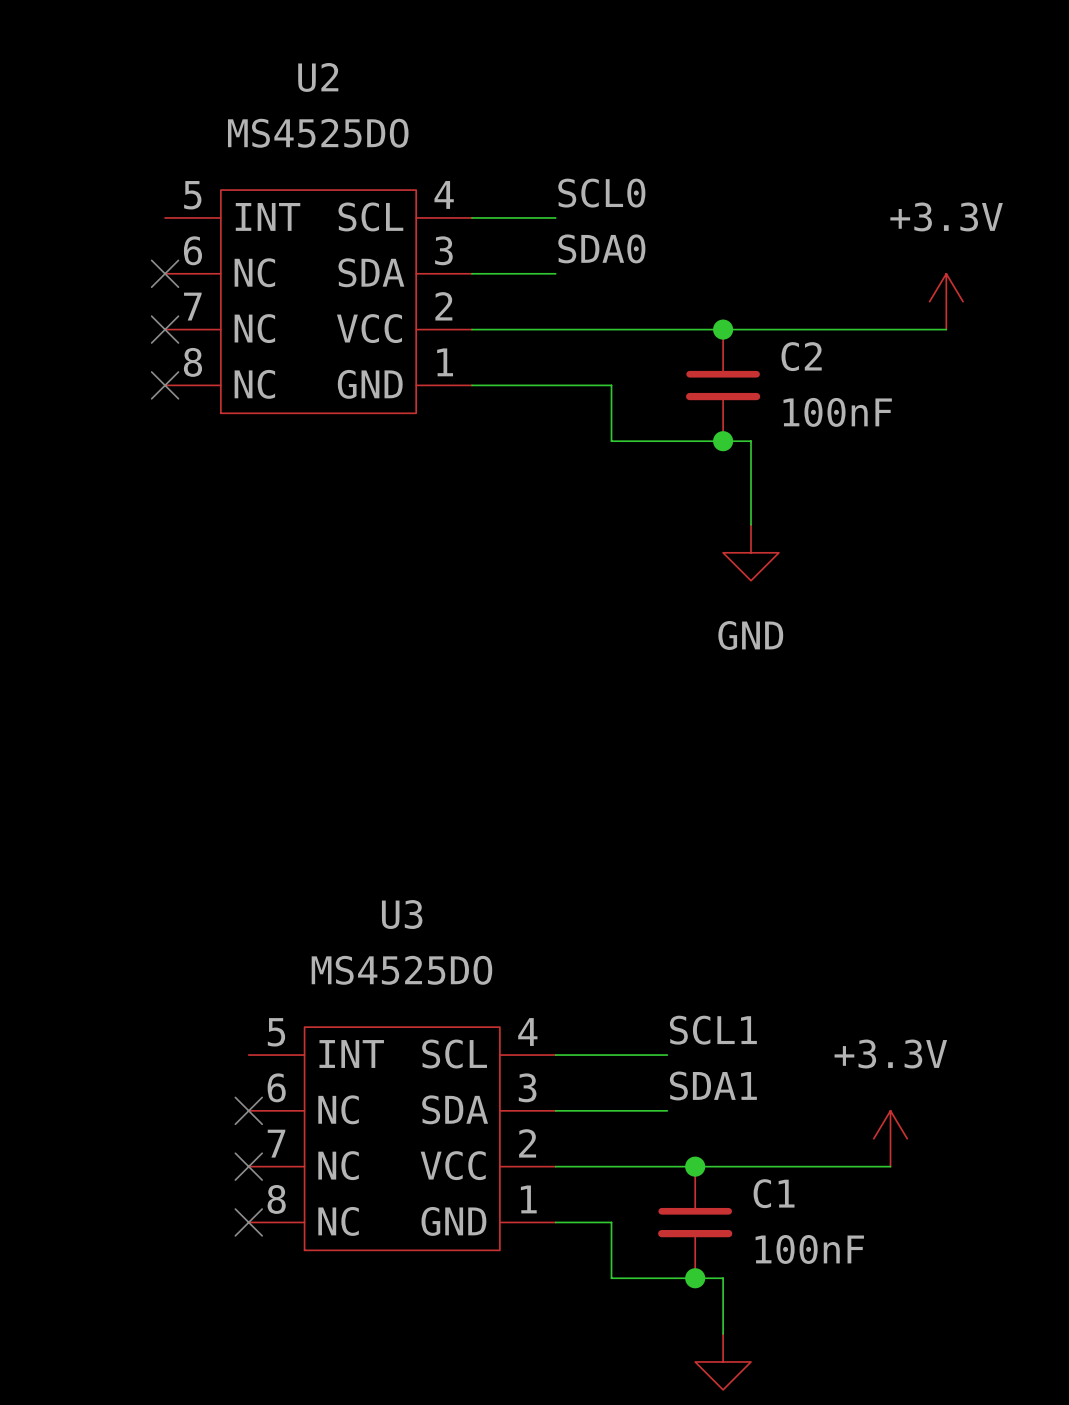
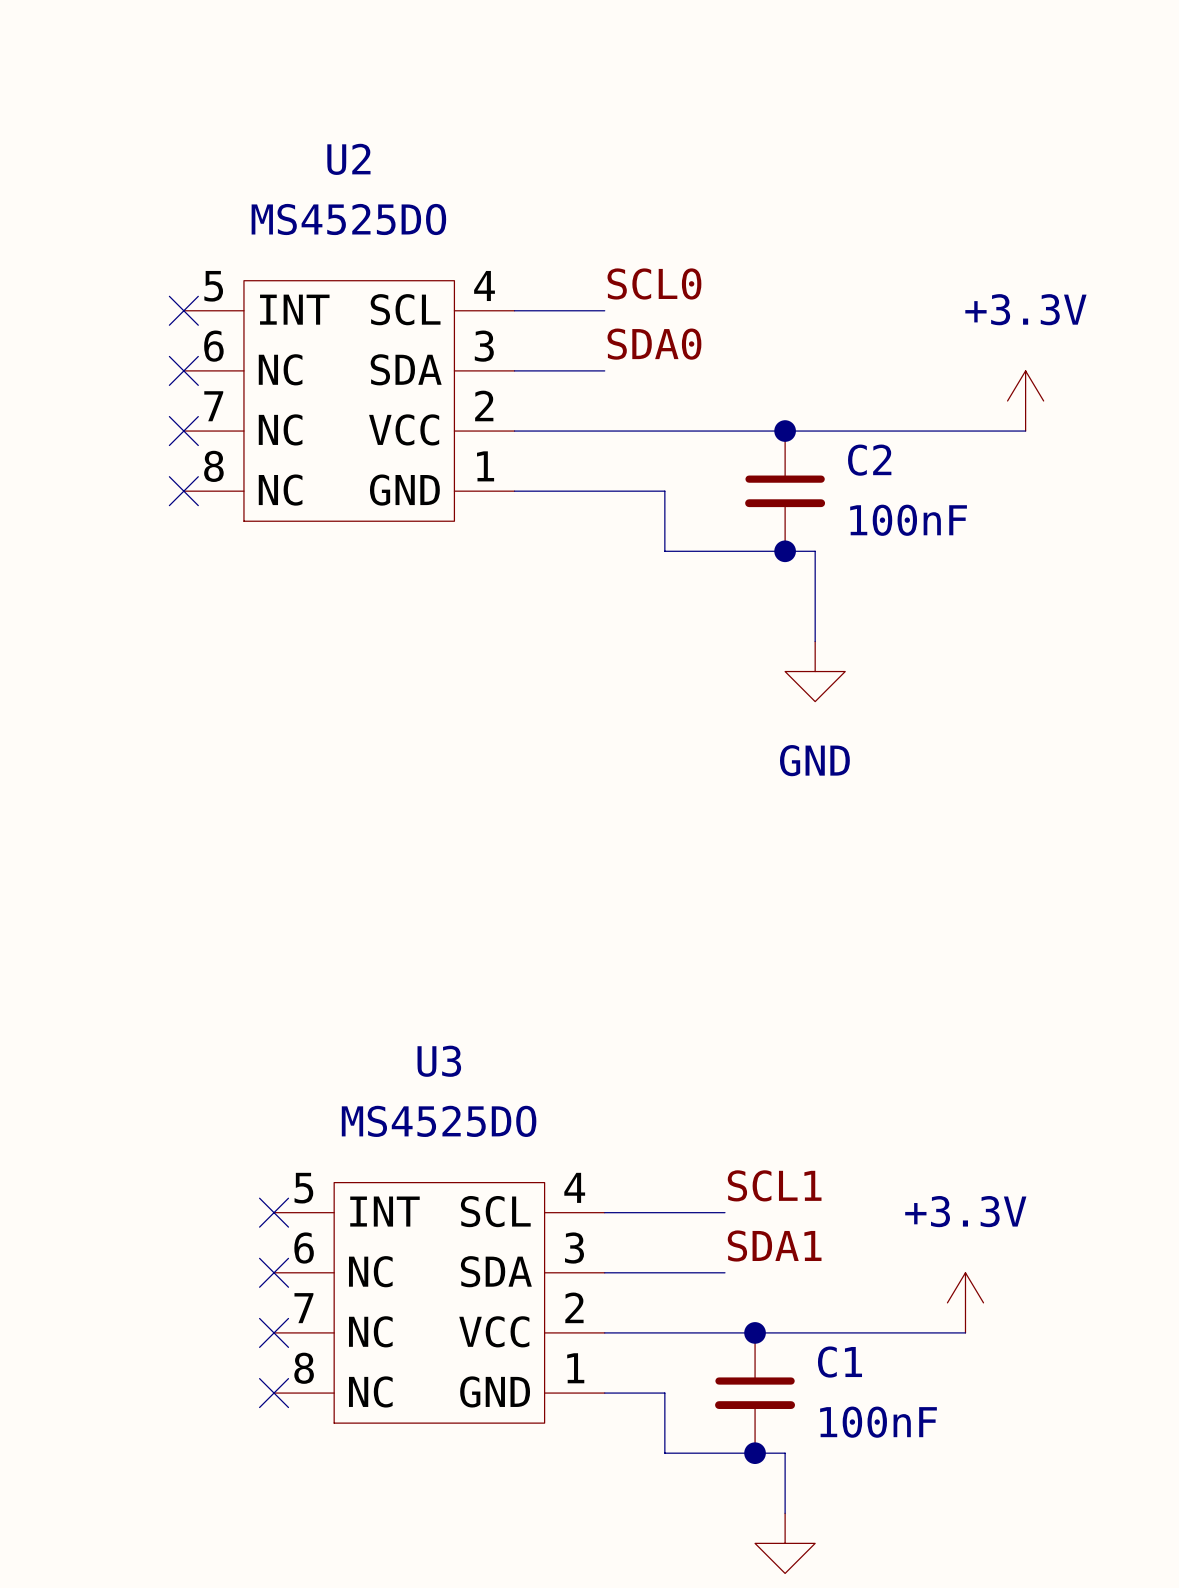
no-connect mark: none -> (183, 310)
no-connect mark: none -> (274, 1212)

